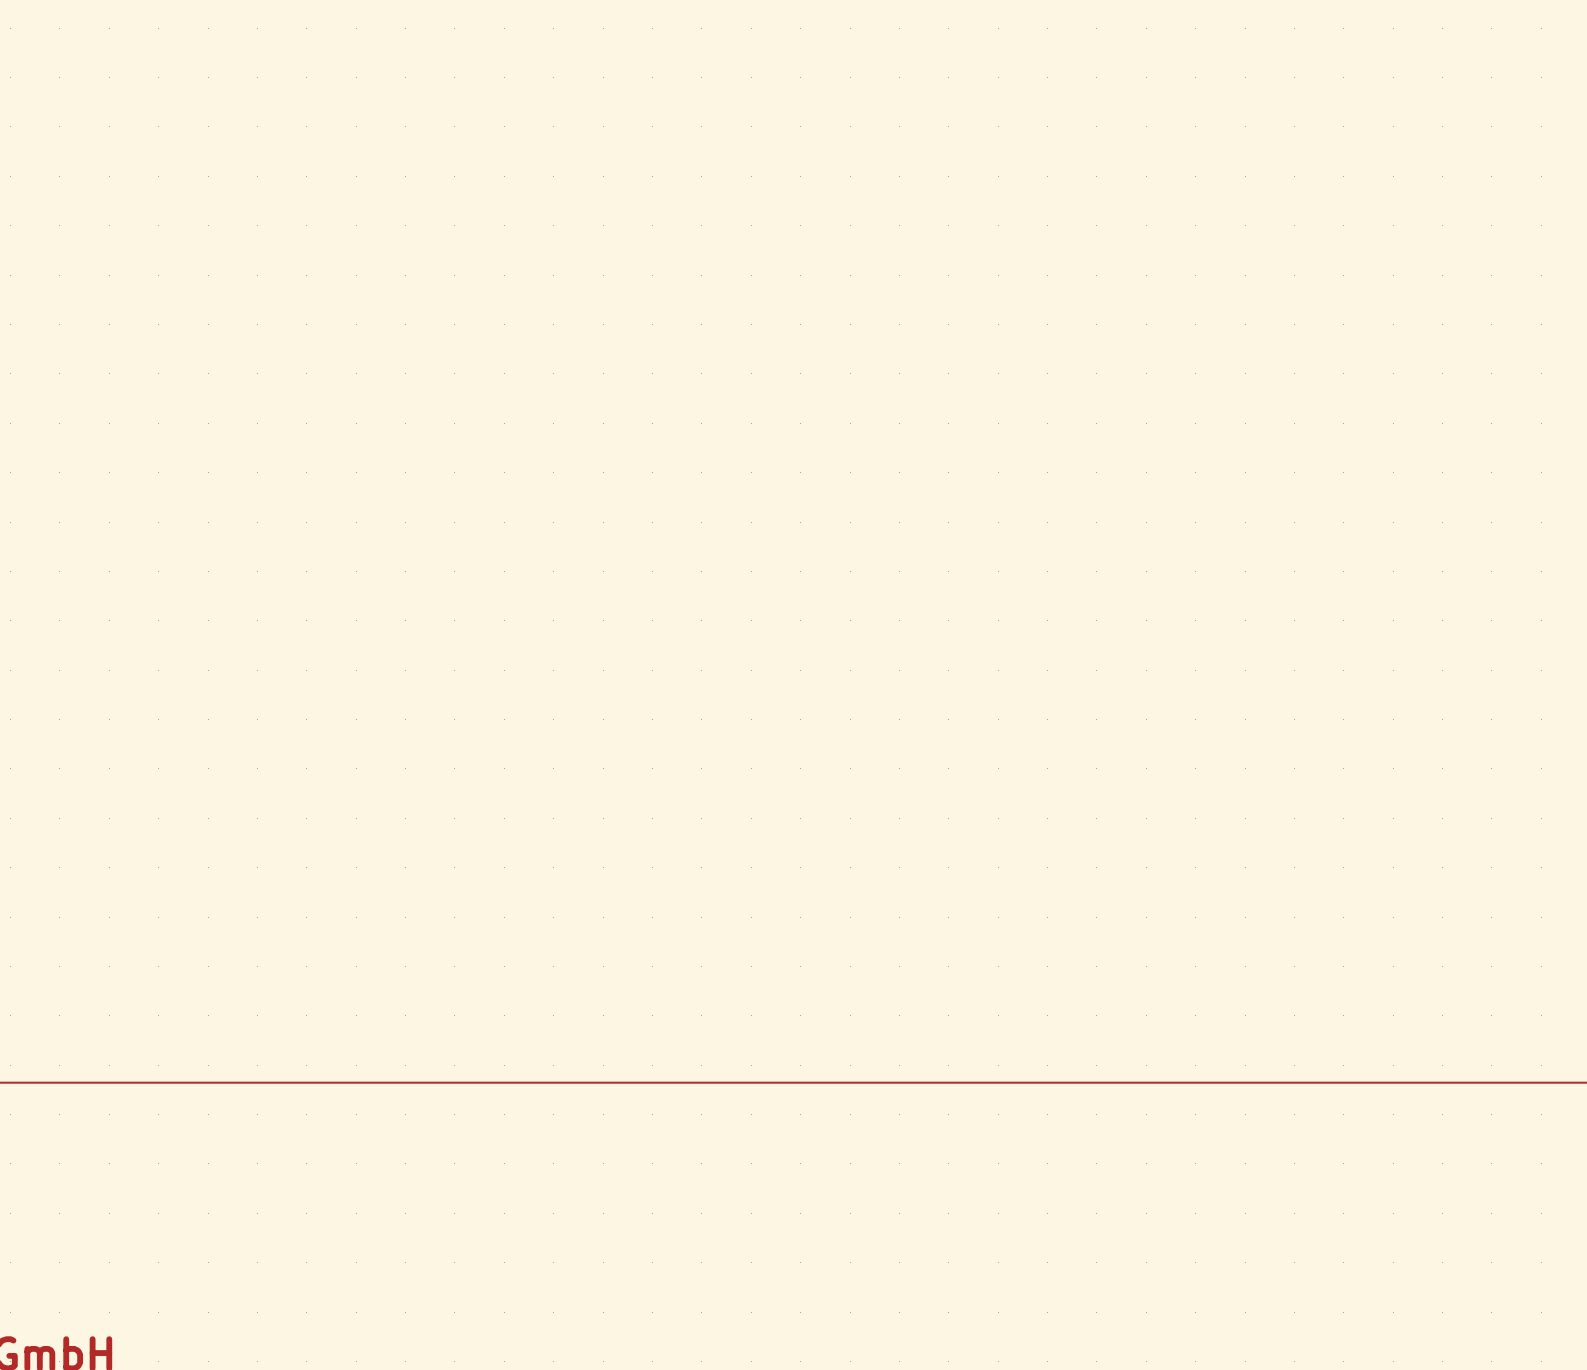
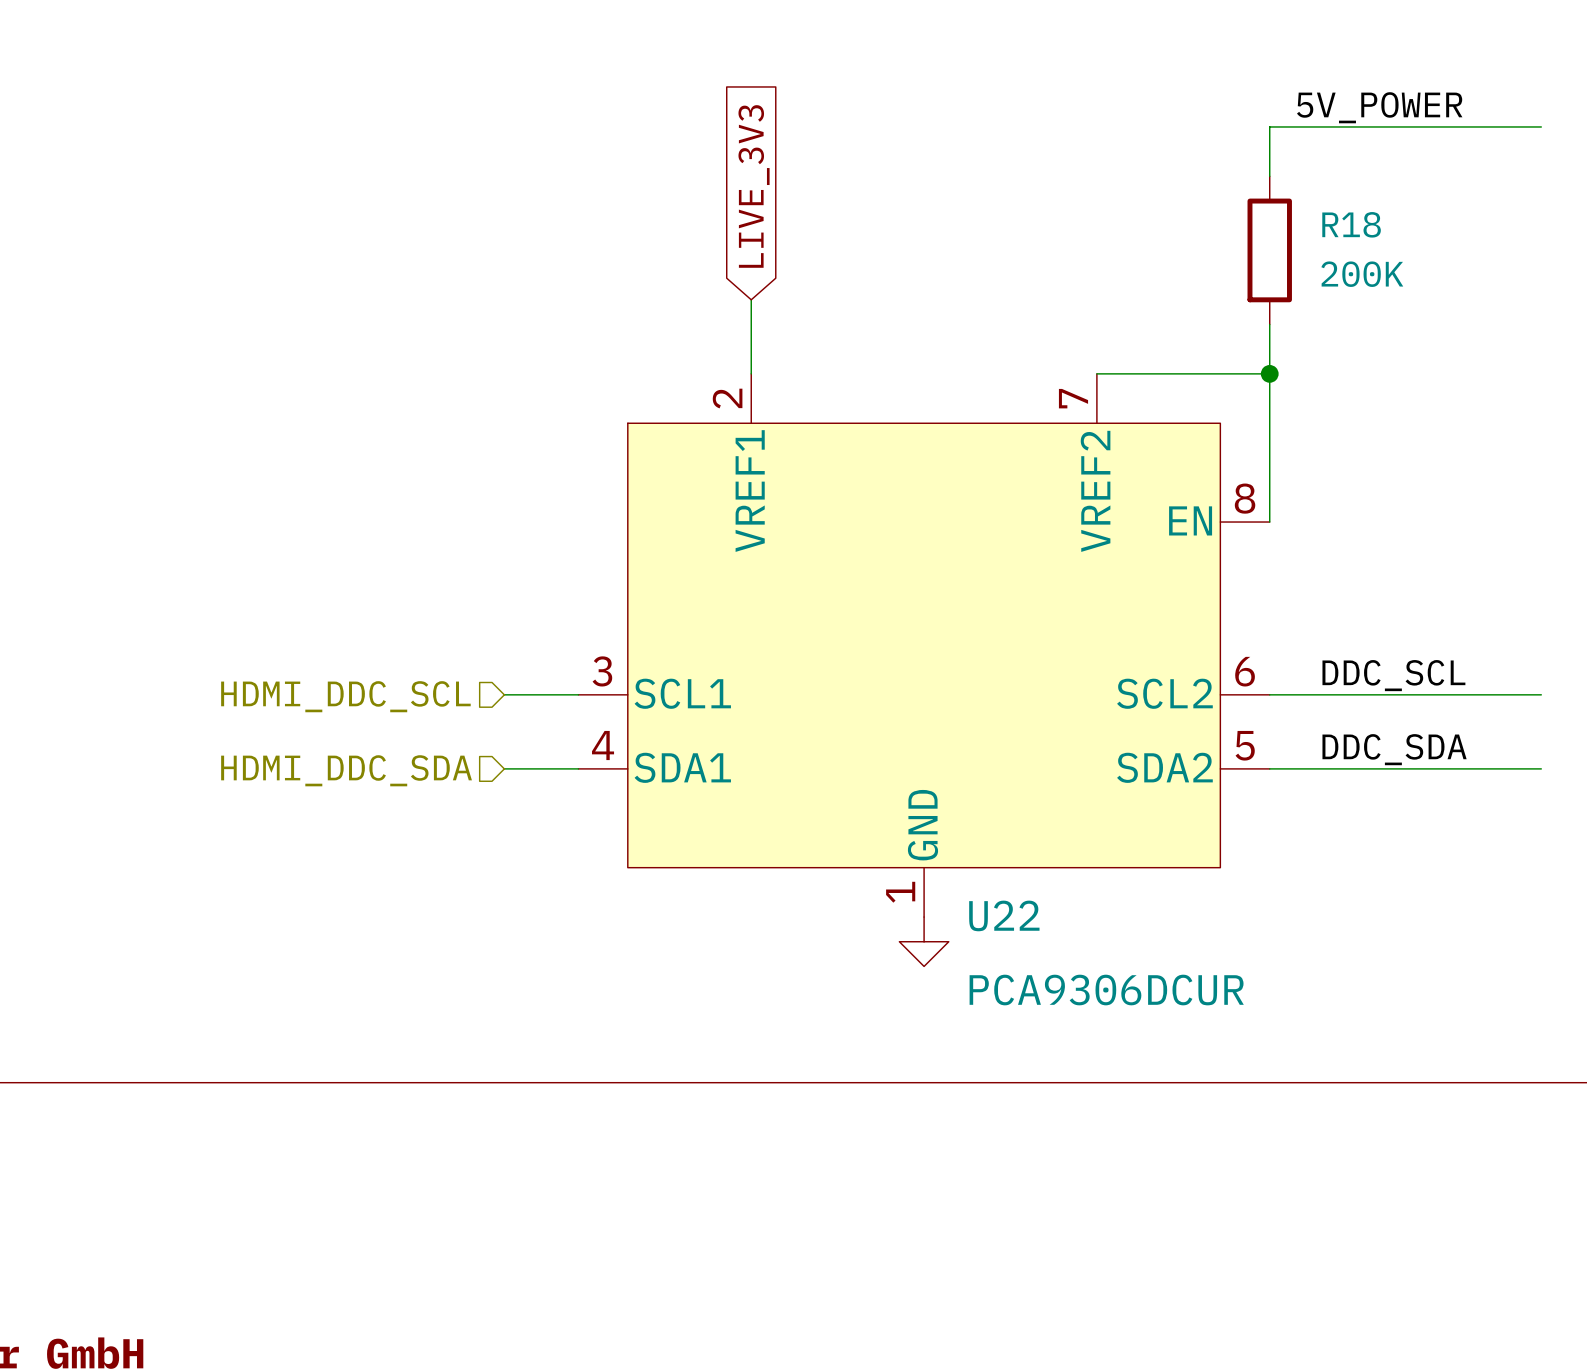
label: none -> 5V_POWER (1379, 107)
wire: none -> (1541, 126) (1269, 126) (1269, 176)
global label: none -> LIVE_3V3 (754, 186)
R18: none -> 200K (1269, 250)
wire: none -> (751, 299) (751, 373)
wire: none -> (1269, 324) (1269, 522)
wire: none -> (1096, 373) (1269, 373)
junction: none -> (1269, 373)
U22: none -> PCA9306DCUR (924, 645)
label: none -> DDC_SCL (1393, 675)
wire: none -> (504, 694) (578, 694)
wire: none -> (1269, 694) (1541, 694)
hierarchical label: none -> HDMI_DDC_SCL (345, 696)
label: none -> DDC_SDA (1394, 749)
wire: none -> (504, 768) (578, 768)
wire: none -> (1269, 768) (1541, 768)
hierarchical label: none -> HDMI_DDC_SDA (346, 770)
power symbol: none -> (924, 941)

